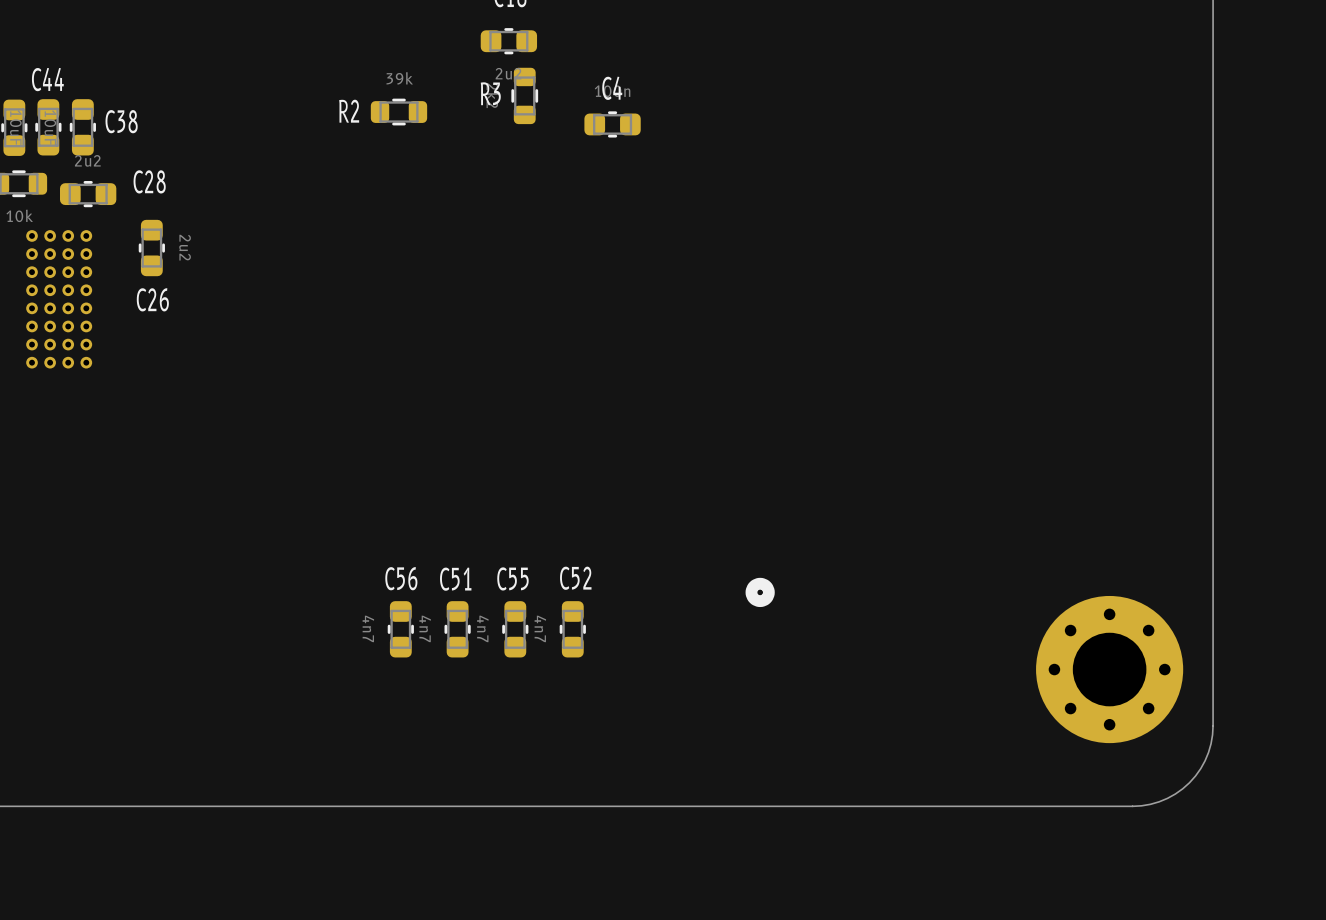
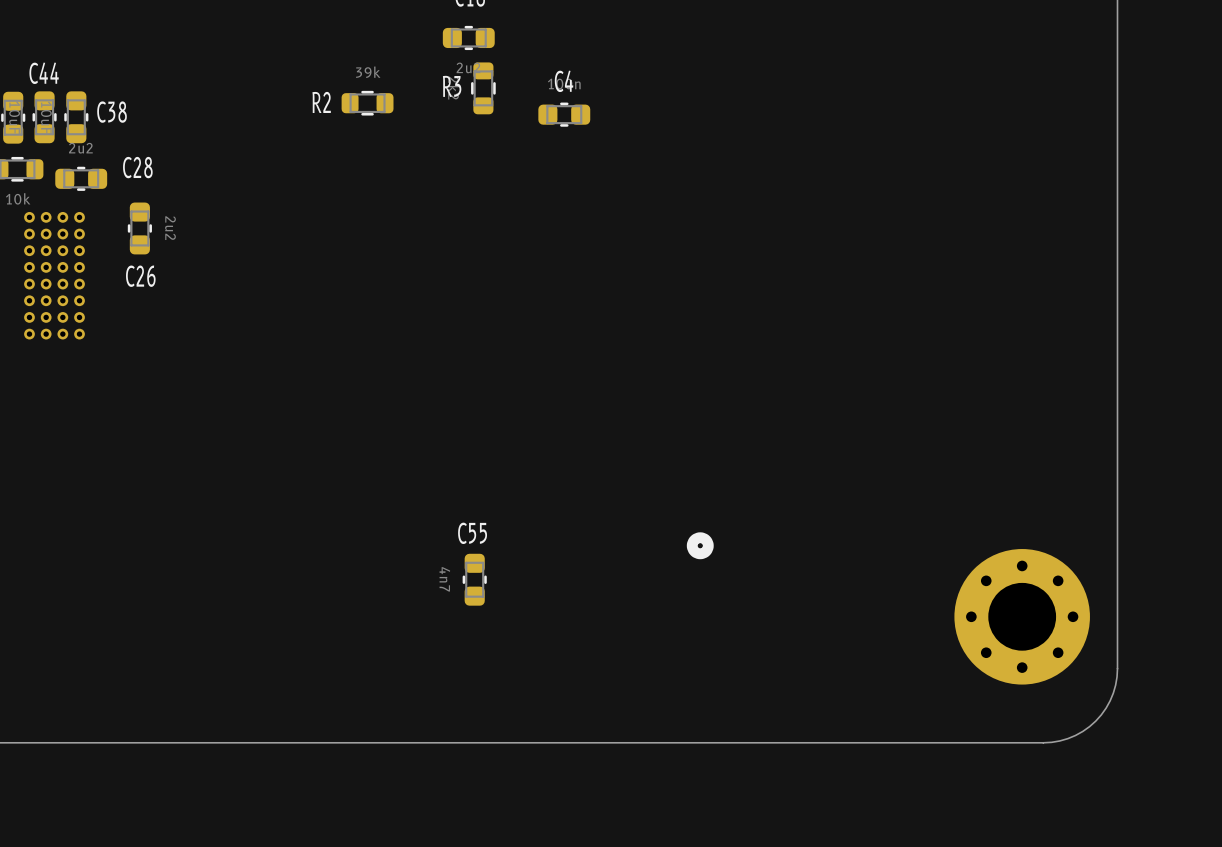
C56: 4n7 (400, 629) -> none
C51: 4n7 (457, 629) -> none
C52: 4n7 (572, 629) -> none

